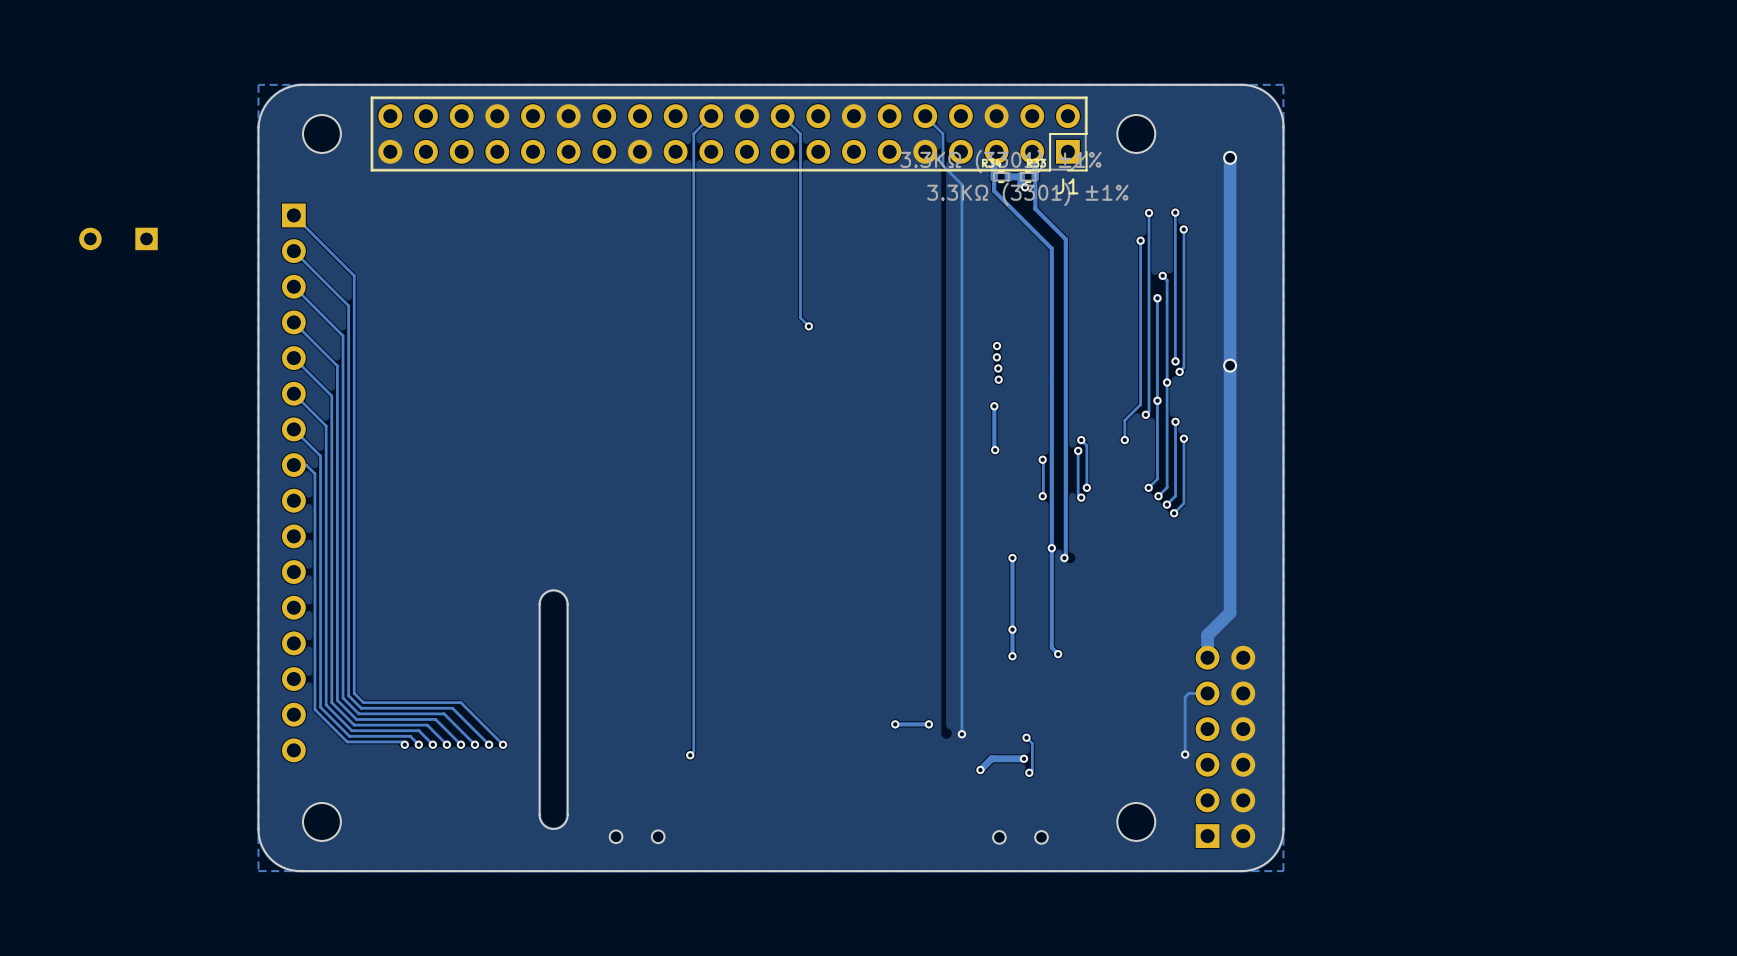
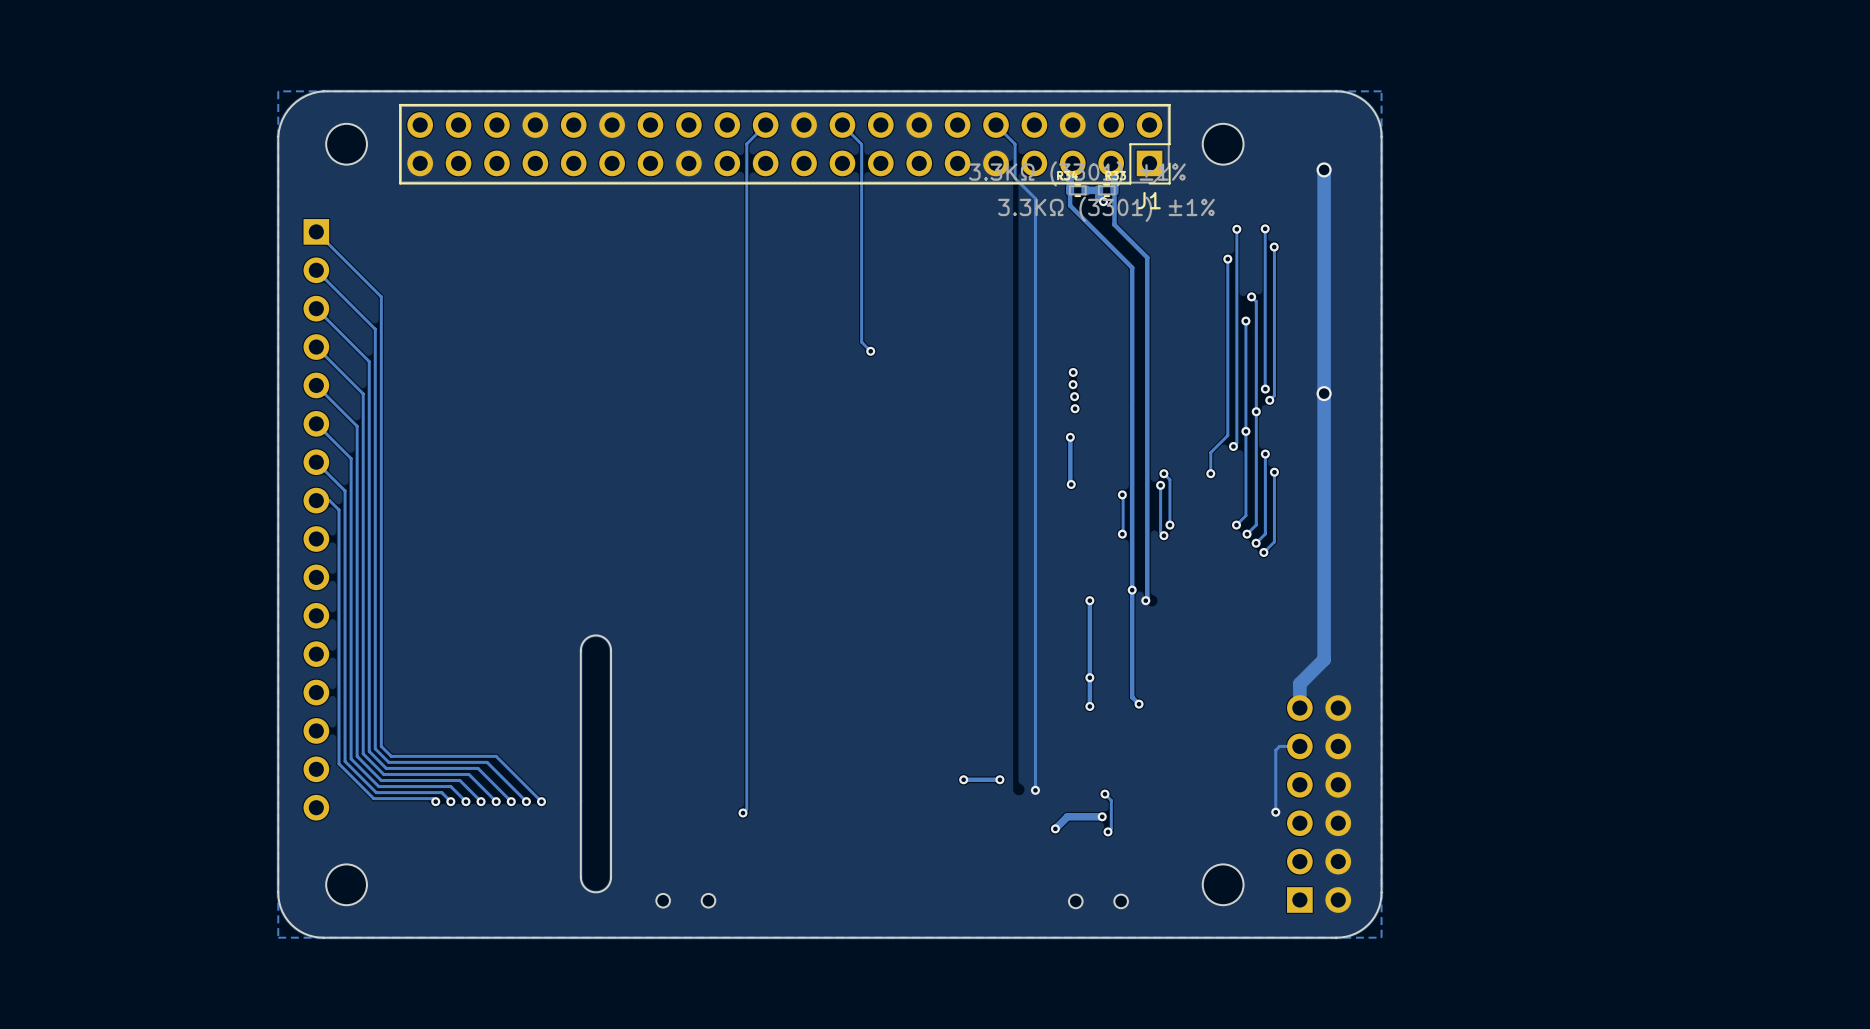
part: (118, 238) -> none

